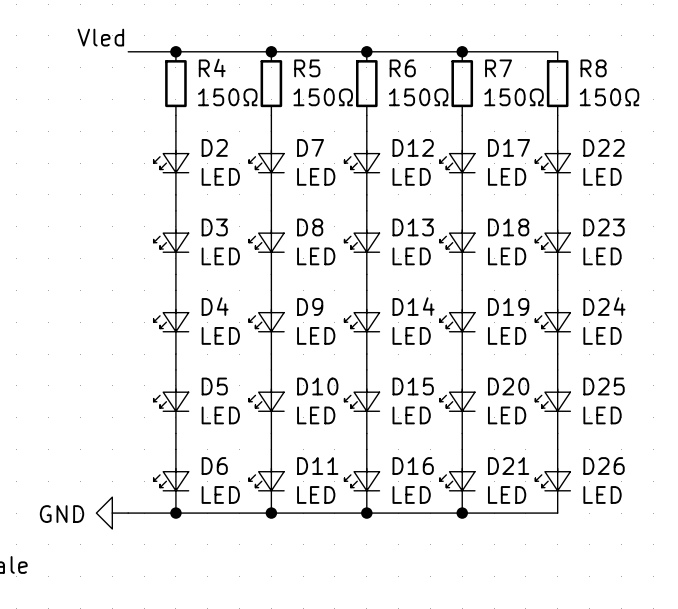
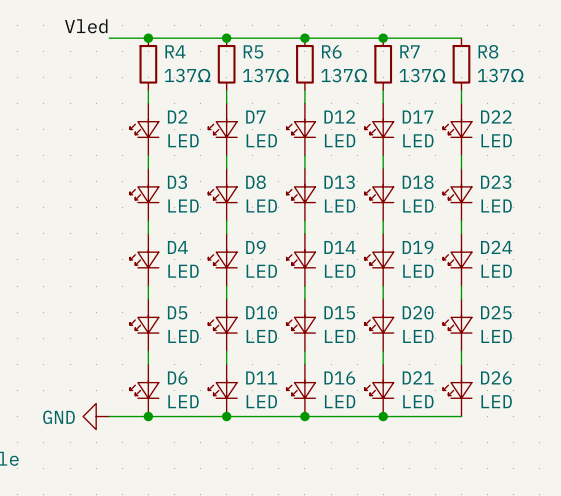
R4 value: 150Ω (227, 97) -> 137Ω (187, 75)
R5 value: 150Ω (323, 97) -> 137Ω (265, 75)
R6 value: 150Ω (418, 97) -> 137Ω (344, 75)
R7 value: 150Ω (514, 97) -> 137Ω (422, 75)
R8 value: 150Ω (609, 97) -> 137Ω (500, 75)

